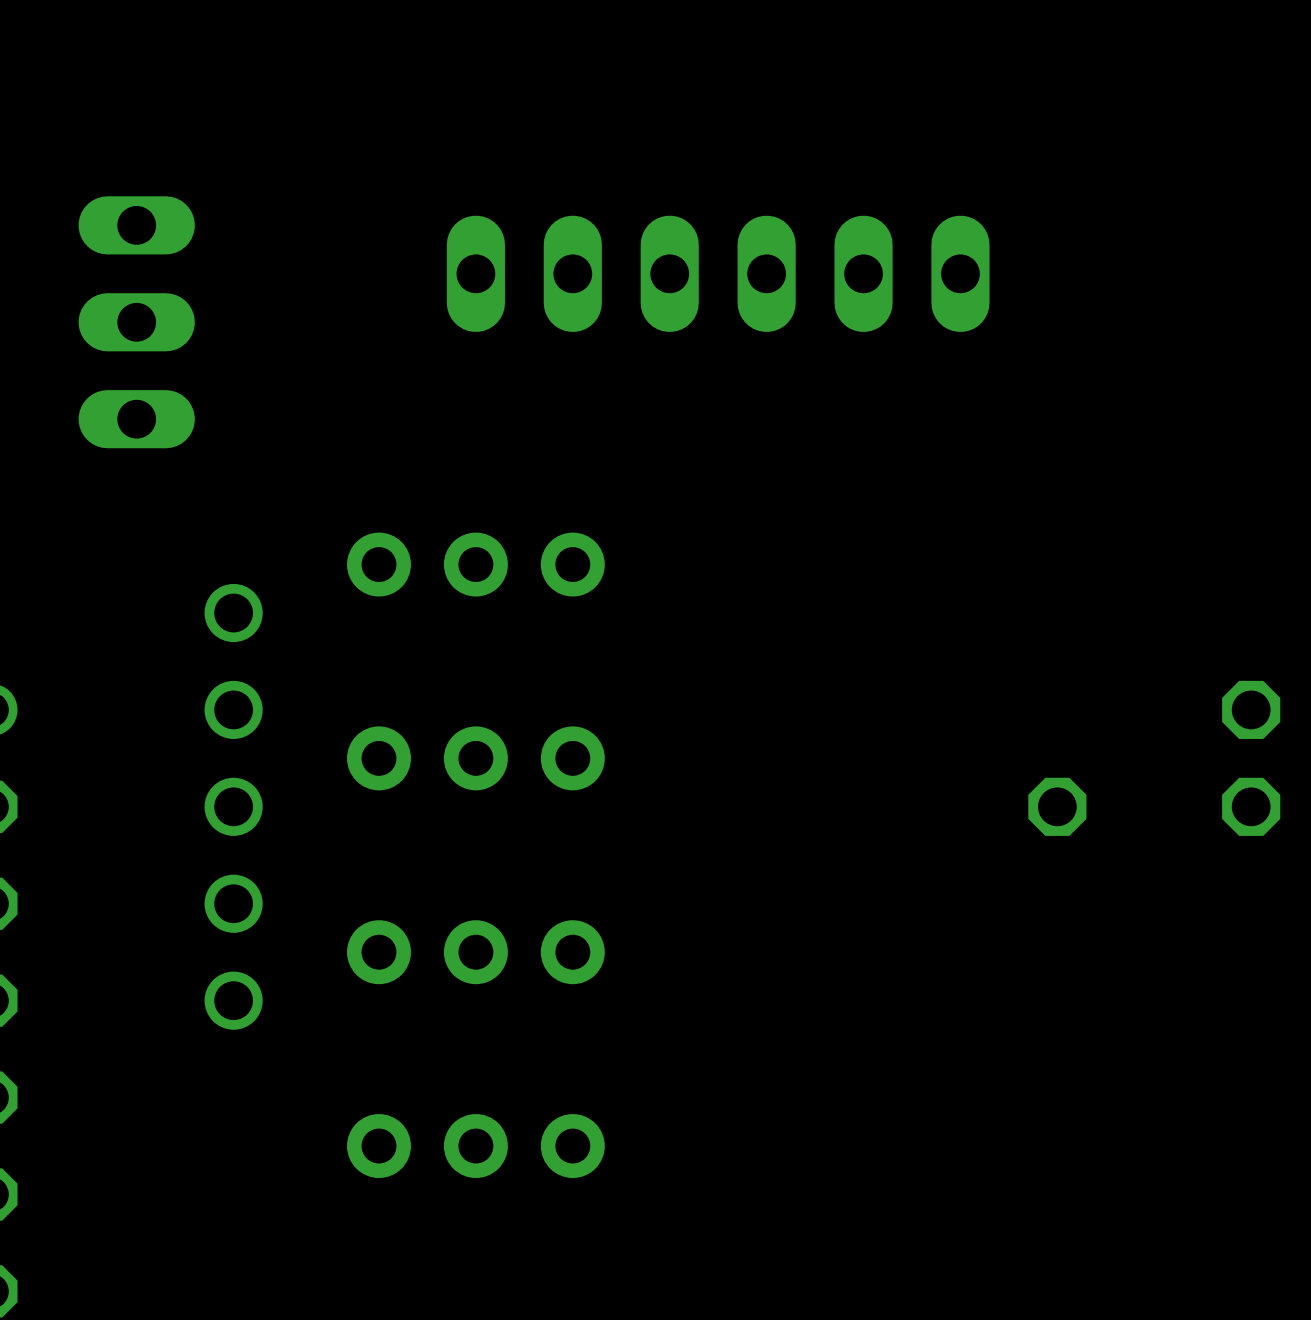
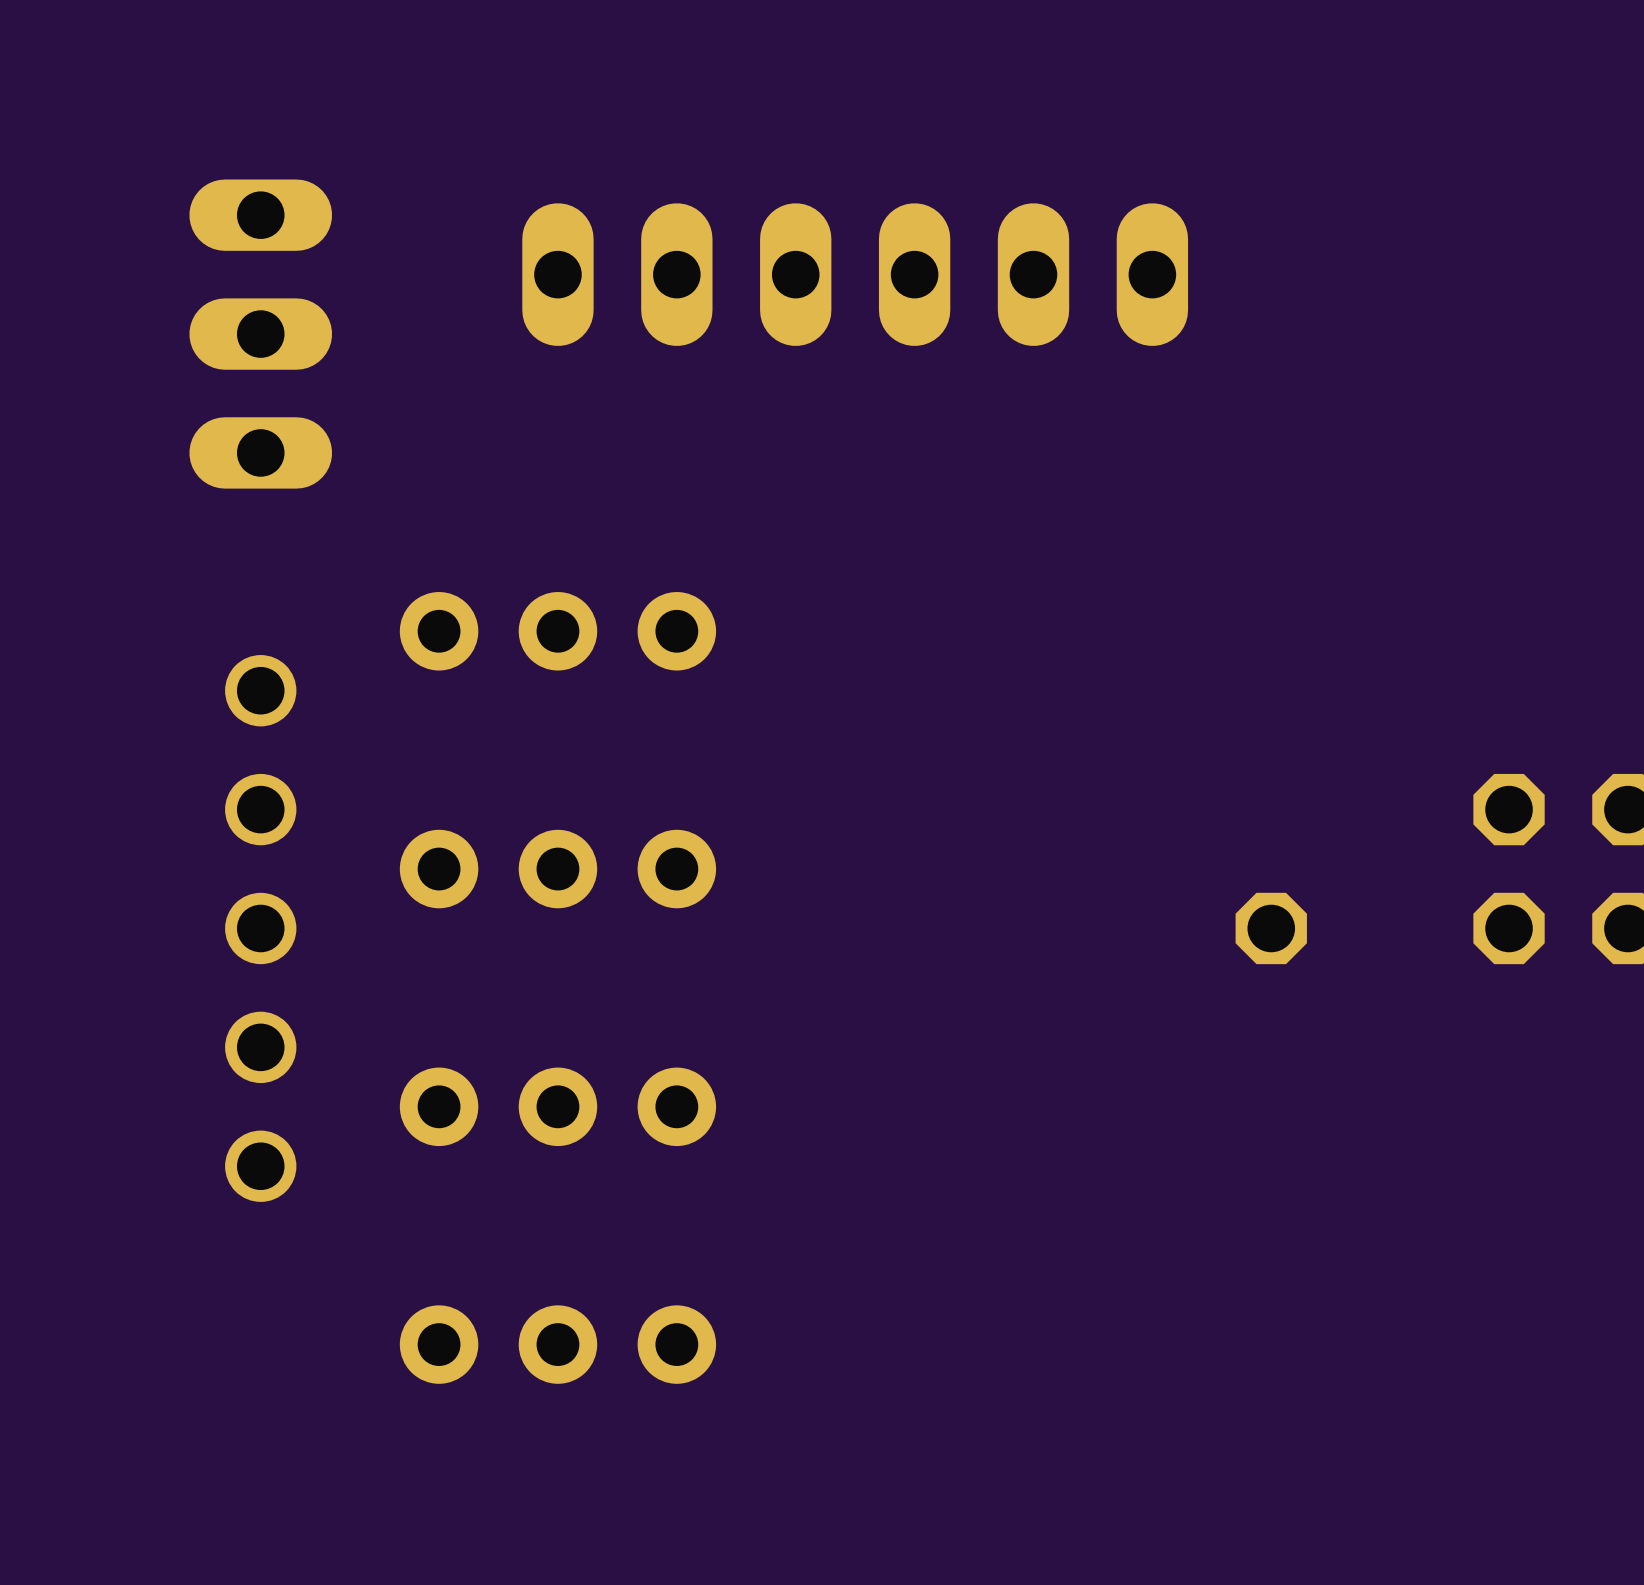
part position: (136, 322) -> (260, 334)

